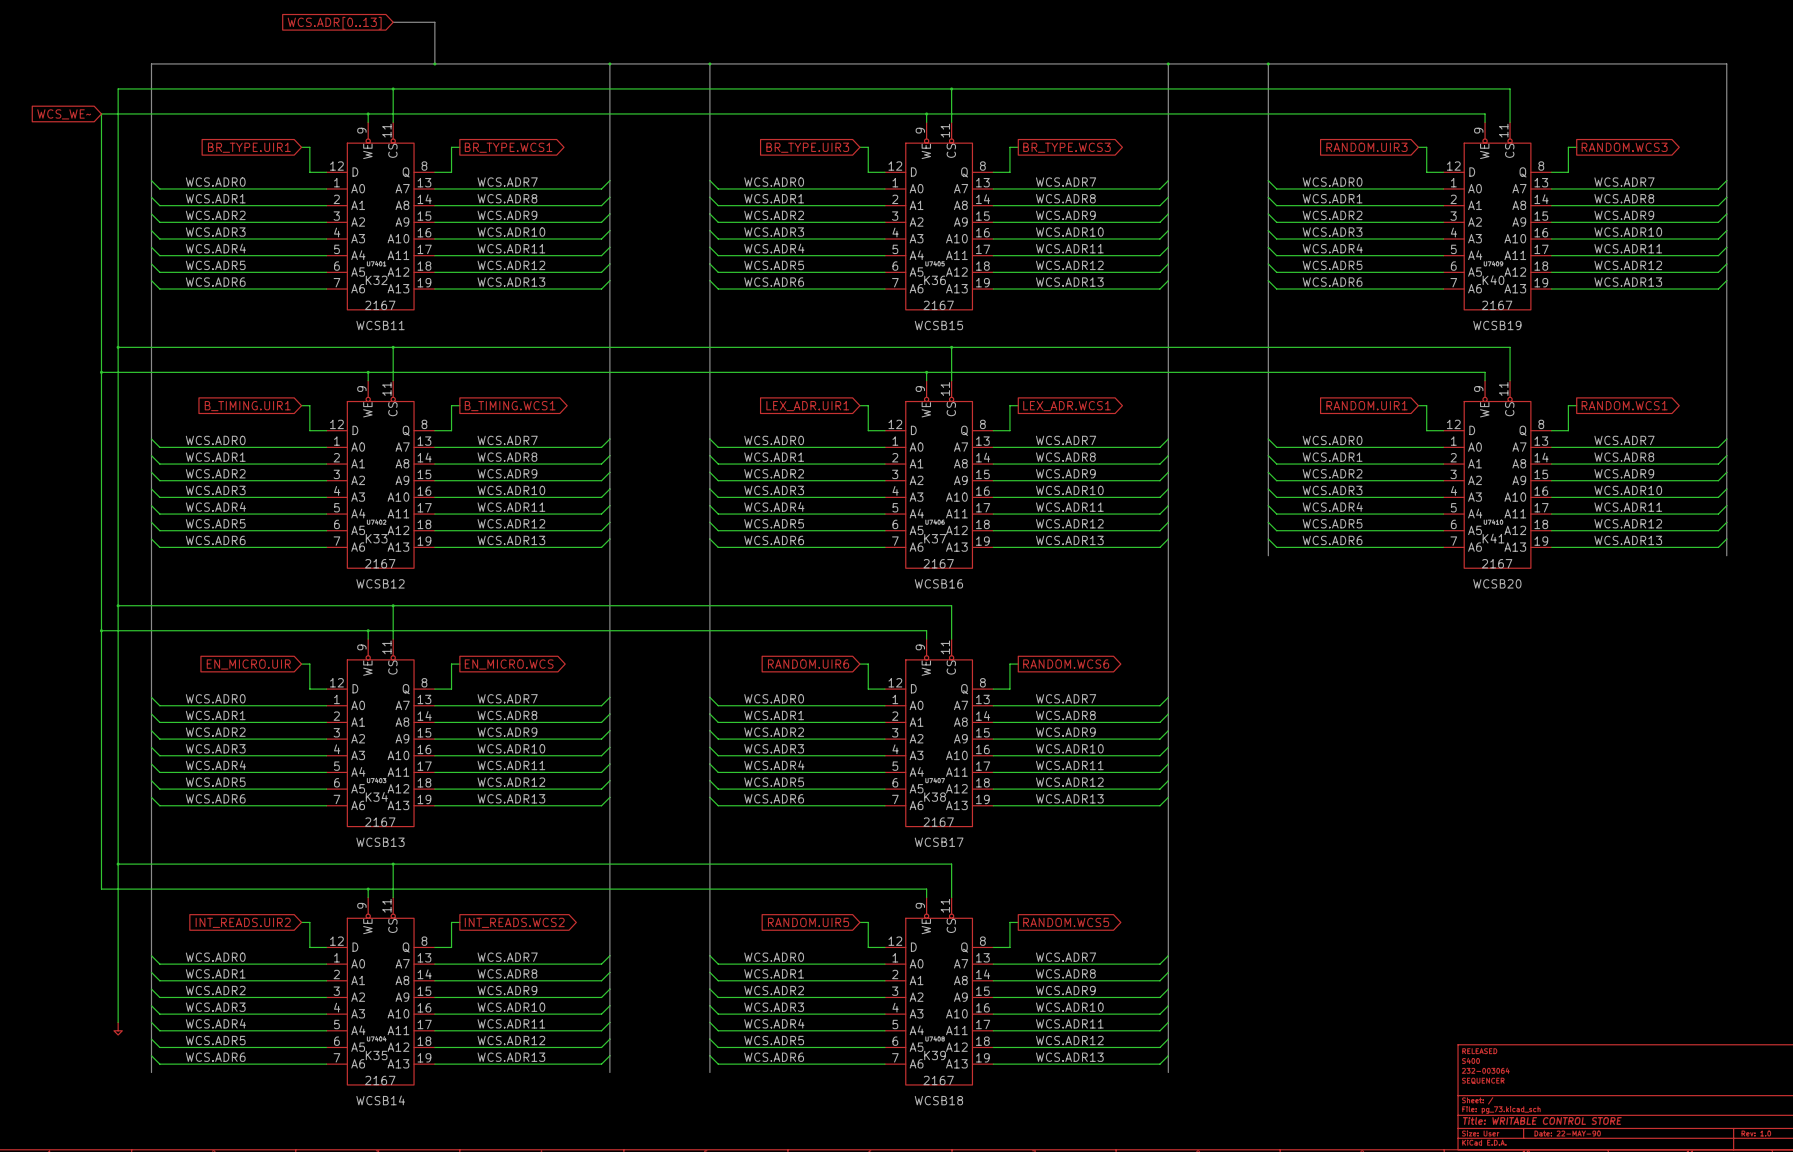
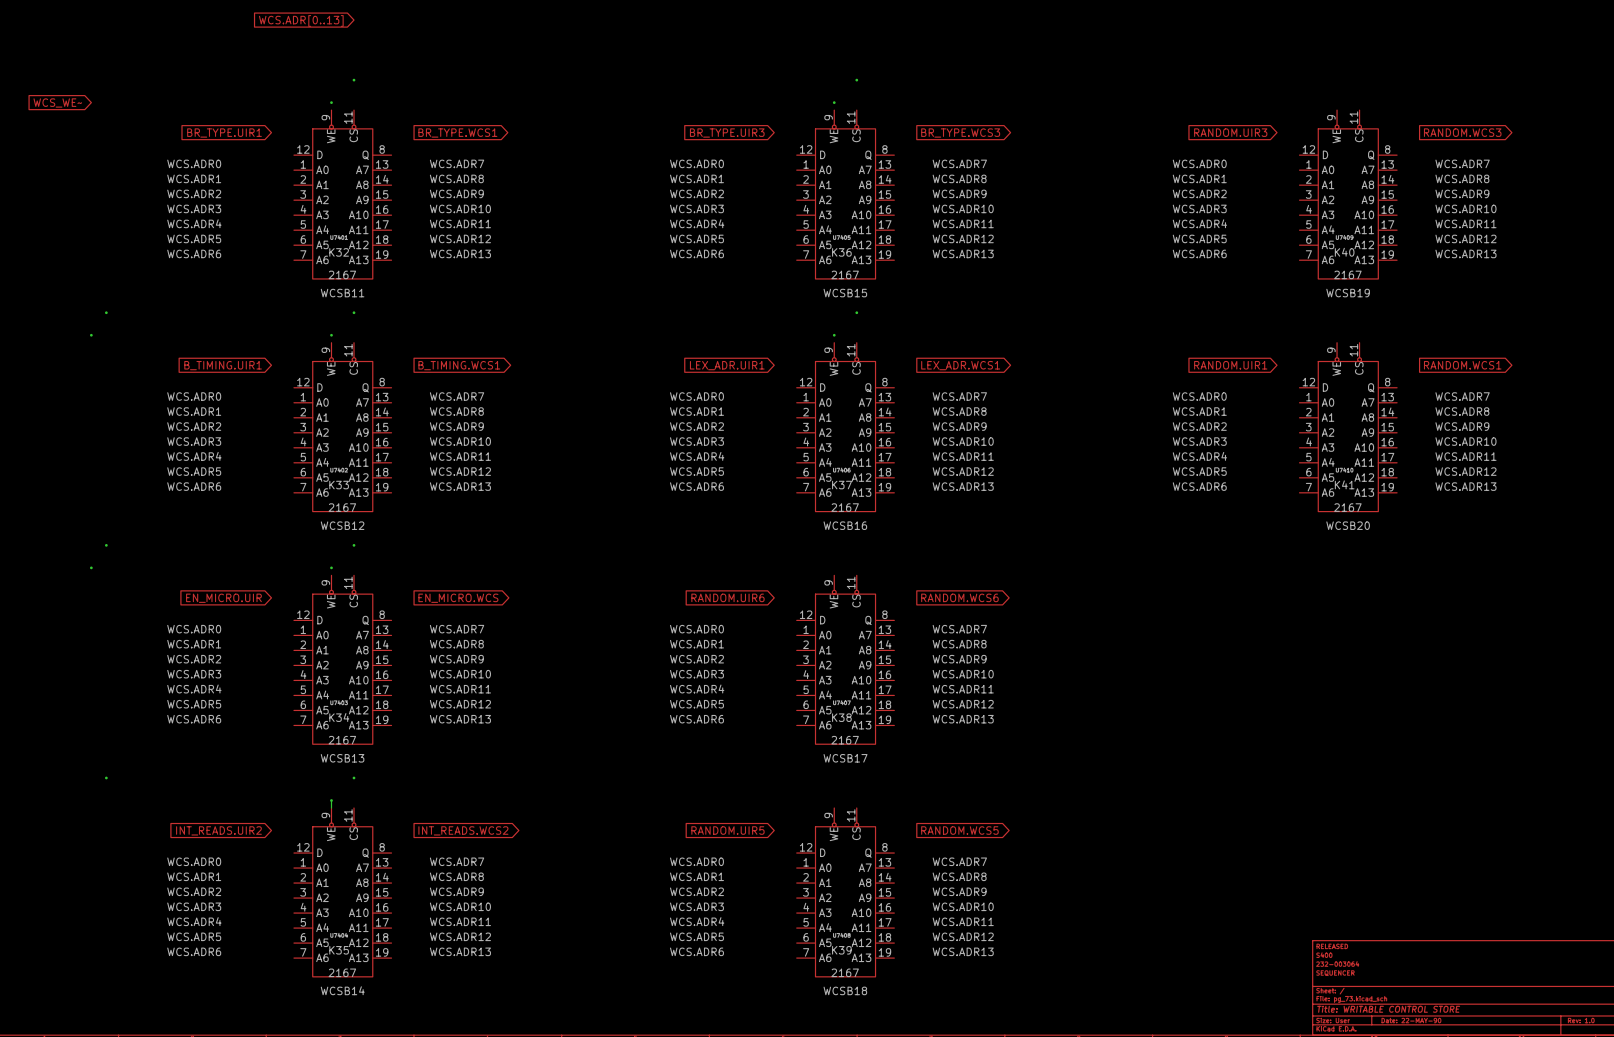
bus: (393, 22) (434, 22) (434, 63) -> none
junction: (434, 63) -> none
bus: (609, 63) (609, 1072) -> none
junction: (609, 63) -> none
bus: (709, 63) (709, 1072) -> none
junction: (709, 63) -> none
bus: (1168, 63) (1168, 1072) -> none
junction: (1168, 63) -> none
bus: (1268, 63) (1268, 555) -> none
junction: (1268, 63) -> none
wire: (393, 88) (393, 122) -> none
wire: (951, 88) (951, 122) -> none
wire: (368, 113) (368, 122) -> none
wire: (926, 113) (926, 122) -> none
wire: (1485, 122) (1485, 113) (101, 113) (101, 889) (926, 889) (926, 897) -> none
wire: (1510, 122) (1510, 88) (118, 88) (118, 1022) -> none
wire: (301, 147) (309, 147) (309, 172) (326, 172) -> none
wire: (459, 147) (451, 147) (451, 172) (434, 172) -> none
wire: (859, 147) (868, 147) (868, 172) (884, 172) -> none
wire: (1018, 147) (1009, 147) (1009, 172) (993, 172) -> none
wire: (1418, 147) (1426, 147) (1426, 172) (1443, 172) -> none
wire: (1576, 147) (1568, 147) (1568, 172) (1551, 172) -> none
wire: (151, 180) (159, 188) (326, 188) -> none
wire: (609, 180) (601, 188) (434, 188) -> none
wire: (709, 180) (718, 188) (884, 188) -> none
wire: (1168, 180) (1159, 188) (993, 188) -> none
wire: (1268, 180) (1276, 188) (1443, 188) -> none
wire: (1726, 180) (1718, 188) (1551, 188) -> none
wire: (151, 197) (159, 205) (326, 205) -> none
wire: (609, 197) (601, 205) (434, 205) -> none
wire: (709, 197) (718, 205) (884, 205) -> none
wire: (1168, 197) (1159, 205) (993, 205) -> none
wire: (1268, 197) (1276, 205) (1443, 205) -> none
wire: (1726, 197) (1718, 205) (1551, 205) -> none
wire: (151, 213) (159, 222) (326, 222) -> none
wire: (609, 213) (601, 222) (434, 222) -> none
wire: (709, 213) (718, 222) (884, 222) -> none
wire: (1168, 213) (1159, 222) (993, 222) -> none
wire: (1268, 213) (1276, 222) (1443, 222) -> none
wire: (1726, 213) (1718, 222) (1551, 222) -> none
wire: (151, 230) (159, 239) (326, 239) -> none
wire: (609, 230) (601, 239) (434, 239) -> none
wire: (709, 230) (718, 239) (884, 239) -> none
wire: (1168, 230) (1159, 239) (993, 239) -> none
wire: (1268, 230) (1276, 239) (1443, 239) -> none
wire: (1726, 230) (1718, 239) (1551, 239) -> none
wire: (151, 247) (159, 255) (326, 255) -> none
wire: (609, 247) (601, 255) (434, 255) -> none
wire: (709, 247) (718, 255) (884, 255) -> none
wire: (1168, 247) (1159, 255) (993, 255) -> none
wire: (1268, 247) (1276, 255) (1443, 255) -> none
wire: (1726, 247) (1718, 255) (1551, 255) -> none
wire: (151, 264) (159, 272) (326, 272) -> none
wire: (609, 264) (601, 272) (434, 272) -> none
wire: (709, 264) (718, 272) (884, 272) -> none
wire: (1168, 264) (1159, 272) (993, 272) -> none
wire: (1268, 264) (1276, 272) (1443, 272) -> none
wire: (1726, 264) (1718, 272) (1551, 272) -> none
wire: (151, 280) (159, 289) (326, 289) -> none
wire: (609, 280) (601, 289) (434, 289) -> none
wire: (709, 280) (718, 289) (884, 289) -> none
wire: (1168, 280) (1159, 289) (993, 289) -> none
wire: (1268, 280) (1276, 289) (1443, 289) -> none
wire: (1726, 280) (1718, 289) (1551, 289) -> none
wire: (118, 347) (1510, 347) (1510, 380) -> none
wire: (393, 347) (393, 380) -> none
wire: (951, 347) (951, 380) -> none
wire: (101, 372) (1485, 372) (1485, 380) -> none
wire: (368, 372) (368, 380) -> none
wire: (926, 372) (926, 380) -> none
wire: (301, 405) (309, 405) (309, 430) (326, 430) -> none
wire: (459, 405) (451, 405) (451, 430) (434, 430) -> none
wire: (859, 405) (868, 405) (868, 430) (884, 430) -> none
wire: (1018, 405) (1009, 405) (1009, 430) (993, 430) -> none
wire: (1418, 405) (1426, 405) (1426, 430) (1443, 430) -> none
wire: (1576, 405) (1568, 405) (1568, 430) (1551, 430) -> none
wire: (151, 439) (159, 447) (326, 447) -> none
wire: (609, 439) (601, 447) (434, 447) -> none
wire: (709, 439) (718, 447) (884, 447) -> none
wire: (1168, 439) (1159, 447) (993, 447) -> none
wire: (1268, 439) (1276, 447) (1443, 447) -> none
wire: (1726, 439) (1718, 447) (1551, 447) -> none
wire: (151, 455) (159, 464) (326, 464) -> none
wire: (609, 455) (601, 464) (434, 464) -> none
wire: (709, 455) (718, 464) (884, 464) -> none
wire: (1168, 455) (1159, 464) (993, 464) -> none
wire: (1268, 455) (1276, 464) (1443, 464) -> none
wire: (1726, 455) (1718, 464) (1551, 464) -> none
wire: (151, 472) (159, 480) (326, 480) -> none
wire: (609, 472) (601, 480) (434, 480) -> none
wire: (709, 472) (718, 480) (884, 480) -> none
wire: (1168, 472) (1159, 480) (993, 480) -> none
wire: (1268, 472) (1276, 480) (1443, 480) -> none
wire: (1726, 472) (1718, 480) (1551, 480) -> none
wire: (151, 489) (159, 497) (326, 497) -> none
wire: (609, 489) (601, 497) (434, 497) -> none
wire: (709, 489) (718, 497) (884, 497) -> none
wire: (1168, 489) (1159, 497) (993, 497) -> none
wire: (1268, 489) (1276, 497) (1443, 497) -> none
wire: (1726, 489) (1718, 497) (1551, 497) -> none
wire: (151, 505) (159, 514) (326, 514) -> none
wire: (609, 505) (601, 514) (434, 514) -> none
wire: (709, 505) (718, 514) (884, 514) -> none
wire: (1168, 505) (1159, 514) (993, 514) -> none
wire: (1268, 505) (1276, 514) (1443, 514) -> none
wire: (1726, 505) (1718, 514) (1551, 514) -> none
wire: (151, 522) (159, 530) (326, 530) -> none
wire: (609, 522) (601, 530) (434, 530) -> none
wire: (709, 522) (718, 530) (884, 530) -> none
wire: (1168, 522) (1159, 530) (993, 530) -> none
wire: (1268, 522) (1276, 530) (1443, 530) -> none
wire: (1726, 522) (1718, 530) (1551, 530) -> none
wire: (151, 539) (159, 547) (326, 547) -> none
wire: (609, 539) (601, 547) (434, 547) -> none
wire: (709, 539) (718, 547) (884, 547) -> none
wire: (1168, 539) (1159, 547) (993, 547) -> none
wire: (1268, 539) (1276, 547) (1443, 547) -> none
wire: (1726, 539) (1718, 547) (1551, 547) -> none
bus: (1726, 555) (1726, 63) (151, 63) (151, 1072) -> none
wire: (118, 605) (951, 605) (951, 639) -> none
wire: (393, 605) (393, 639) -> none
wire: (101, 630) (926, 630) (926, 639) -> none
wire: (368, 630) (368, 639) -> none
wire: (301, 664) (309, 664) (309, 689) (326, 689) -> none
wire: (459, 664) (451, 664) (451, 689) (434, 689) -> none
wire: (859, 664) (868, 664) (868, 689) (884, 689) -> none
wire: (1018, 664) (1009, 664) (1009, 689) (993, 689) -> none
wire: (151, 697) (159, 705) (326, 705) -> none
wire: (609, 697) (601, 705) (434, 705) -> none
wire: (709, 697) (718, 705) (884, 705) -> none
wire: (1168, 697) (1159, 705) (993, 705) -> none
wire: (151, 714) (159, 722) (326, 722) -> none
wire: (609, 714) (601, 722) (434, 722) -> none
wire: (709, 714) (718, 722) (884, 722) -> none
wire: (1168, 714) (1159, 722) (993, 722) -> none
wire: (151, 730) (159, 739) (326, 739) -> none
wire: (609, 730) (601, 739) (434, 739) -> none
wire: (709, 730) (718, 739) (884, 739) -> none
wire: (1168, 730) (1159, 739) (993, 739) -> none
wire: (151, 747) (159, 755) (326, 755) -> none
wire: (609, 747) (601, 755) (434, 755) -> none
wire: (709, 747) (718, 755) (884, 755) -> none
wire: (1168, 747) (1159, 755) (993, 755) -> none
wire: (151, 764) (159, 772) (326, 772) -> none
wire: (609, 764) (601, 772) (434, 772) -> none
wire: (709, 764) (718, 772) (884, 772) -> none
wire: (1168, 764) (1159, 772) (993, 772) -> none
wire: (151, 780) (159, 789) (326, 789) -> none
wire: (609, 780) (601, 789) (434, 789) -> none
wire: (709, 780) (718, 789) (884, 789) -> none
wire: (1168, 780) (1159, 789) (993, 789) -> none
wire: (151, 797) (159, 805) (326, 805) -> none
wire: (609, 797) (601, 805) (434, 805) -> none
wire: (709, 797) (718, 805) (884, 805) -> none
wire: (1168, 797) (1159, 805) (993, 805) -> none
wire: (118, 864) (951, 864) (951, 897) -> none
wire: (393, 864) (393, 897) -> none
wire: (301, 922) (309, 922) (309, 947) (326, 947) -> none
wire: (459, 922) (451, 922) (451, 947) (434, 947) -> none
wire: (859, 922) (868, 922) (868, 947) (884, 947) -> none
wire: (1018, 922) (1009, 922) (1009, 947) (993, 947) -> none
wire: (151, 955) (159, 964) (326, 964) -> none
wire: (609, 955) (601, 964) (434, 964) -> none
wire: (709, 955) (718, 964) (884, 964) -> none
wire: (1168, 955) (1159, 964) (993, 964) -> none
wire: (151, 972) (159, 980) (326, 980) -> none
wire: (609, 972) (601, 980) (434, 980) -> none
wire: (709, 972) (718, 980) (884, 980) -> none
wire: (1168, 972) (1159, 980) (993, 980) -> none
wire: (151, 989) (159, 997) (326, 997) -> none
wire: (609, 989) (601, 997) (434, 997) -> none
wire: (709, 989) (718, 997) (884, 997) -> none
wire: (1168, 989) (1159, 997) (993, 997) -> none
wire: (151, 1005) (159, 1014) (326, 1014) -> none
wire: (609, 1005) (601, 1014) (434, 1014) -> none
wire: (709, 1005) (718, 1014) (884, 1014) -> none
wire: (1168, 1005) (1159, 1014) (993, 1014) -> none
wire: (151, 1022) (159, 1030) (326, 1030) -> none
wire: (609, 1022) (601, 1030) (434, 1030) -> none
wire: (709, 1022) (718, 1030) (884, 1030) -> none
wire: (1168, 1022) (1159, 1030) (993, 1030) -> none
power symbol: (118, 1028) -> none
wire: (151, 1039) (159, 1047) (326, 1047) -> none
wire: (609, 1039) (601, 1047) (434, 1047) -> none
wire: (709, 1039) (718, 1047) (884, 1047) -> none
wire: (1168, 1039) (1159, 1047) (993, 1047) -> none
wire: (151, 1055) (159, 1064) (326, 1064) -> none
wire: (609, 1055) (601, 1064) (434, 1064) -> none
wire: (709, 1055) (718, 1064) (884, 1064) -> none
wire: (1168, 1055) (1159, 1064) (993, 1064) -> none

